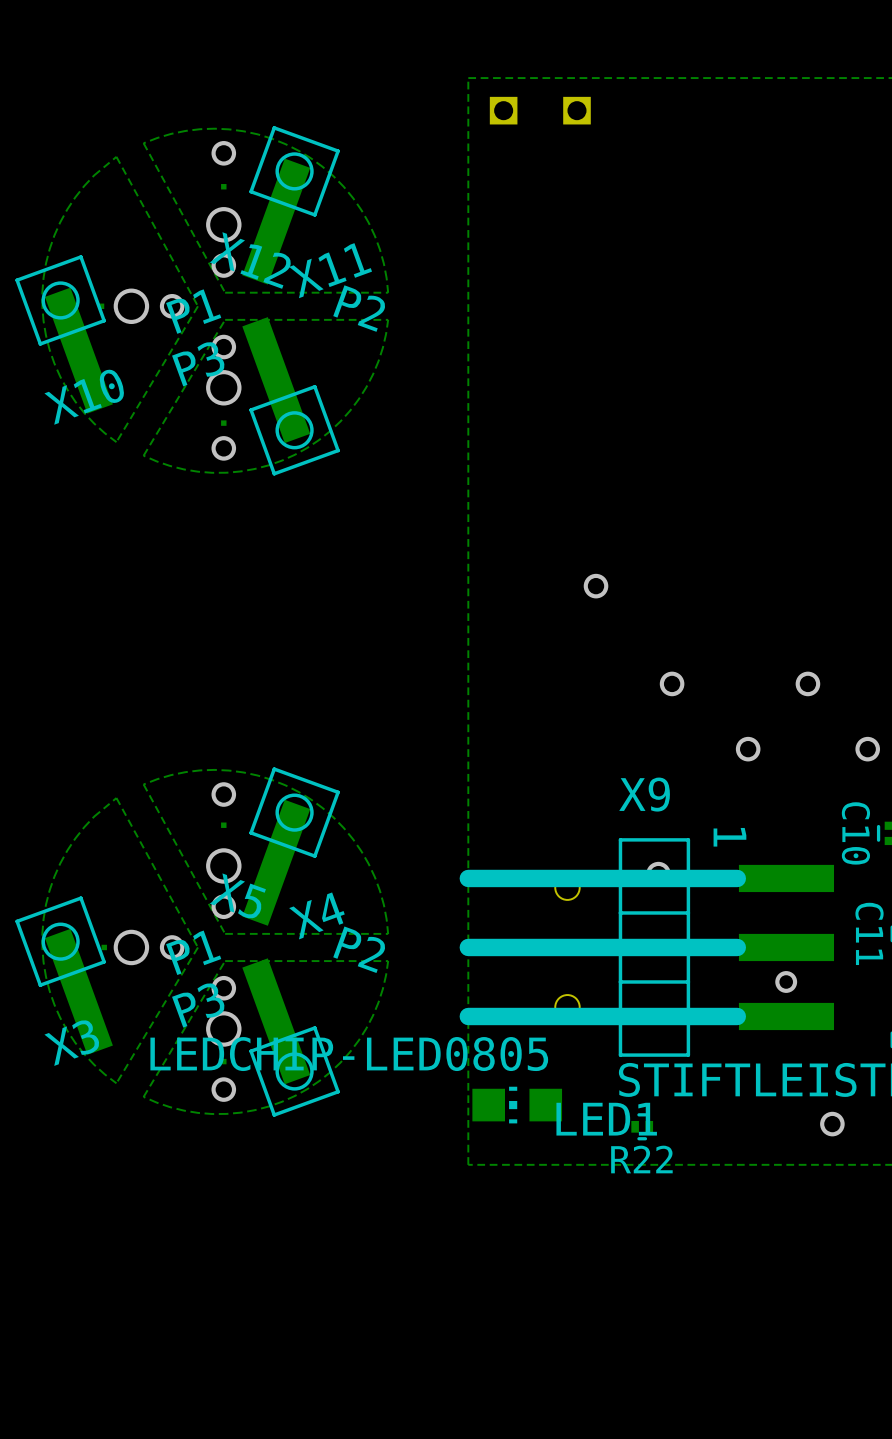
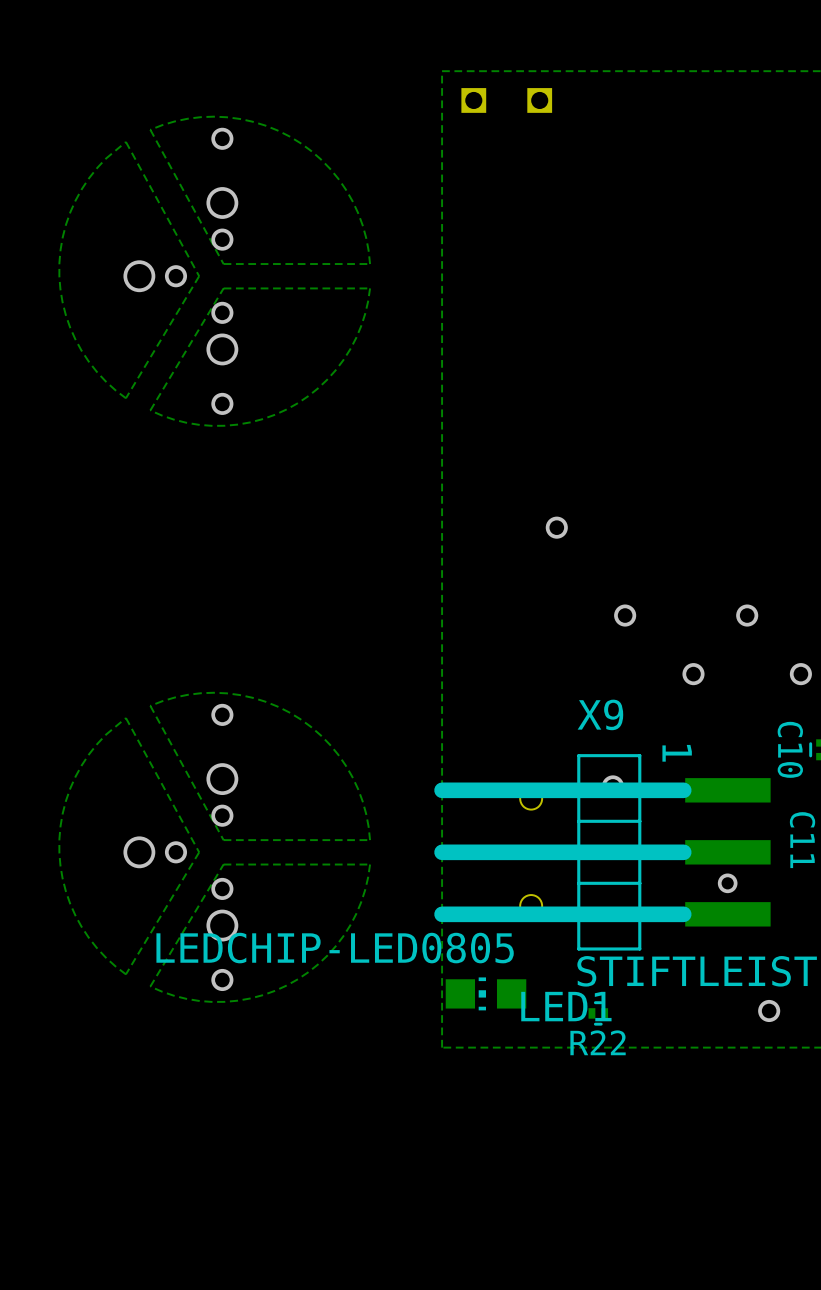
part: (223, 186) -> none
X12: P2 (291, 205) -> none
part: (101, 306) -> none
X10: P3 (64, 334) -> none
X11: P1 (291, 396) -> none
part: (223, 423) -> none
part: (223, 825) -> none
X5: P2 (291, 846) -> none
part: (104, 947) -> none
X3: P3 (64, 975) -> none
X4: P1 (291, 1037) -> none
part: (223, 1061) -> none

